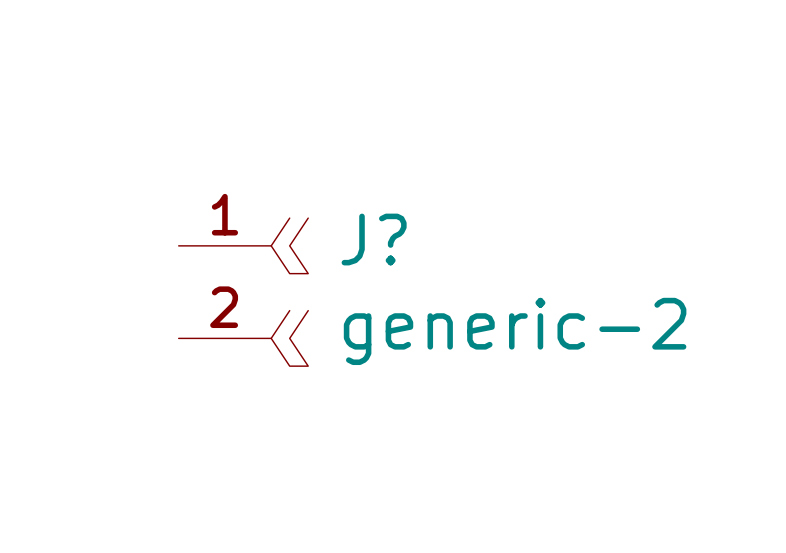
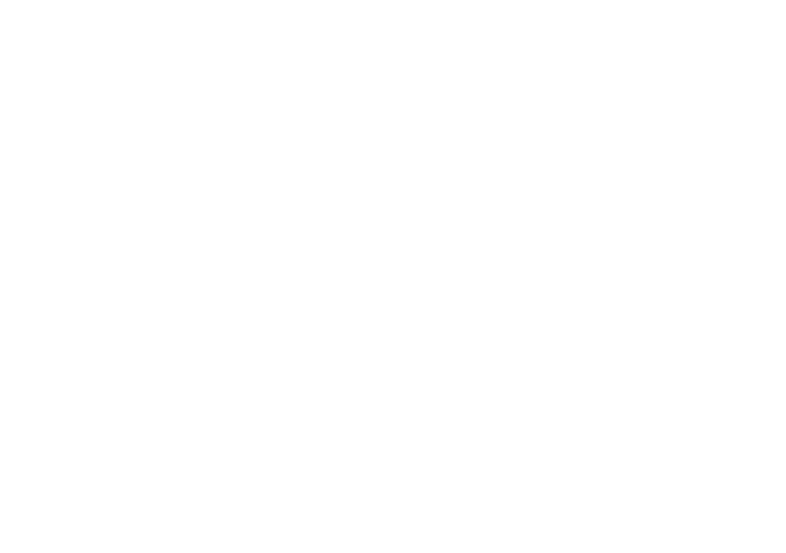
J?: generic-2 (243, 292) -> none

